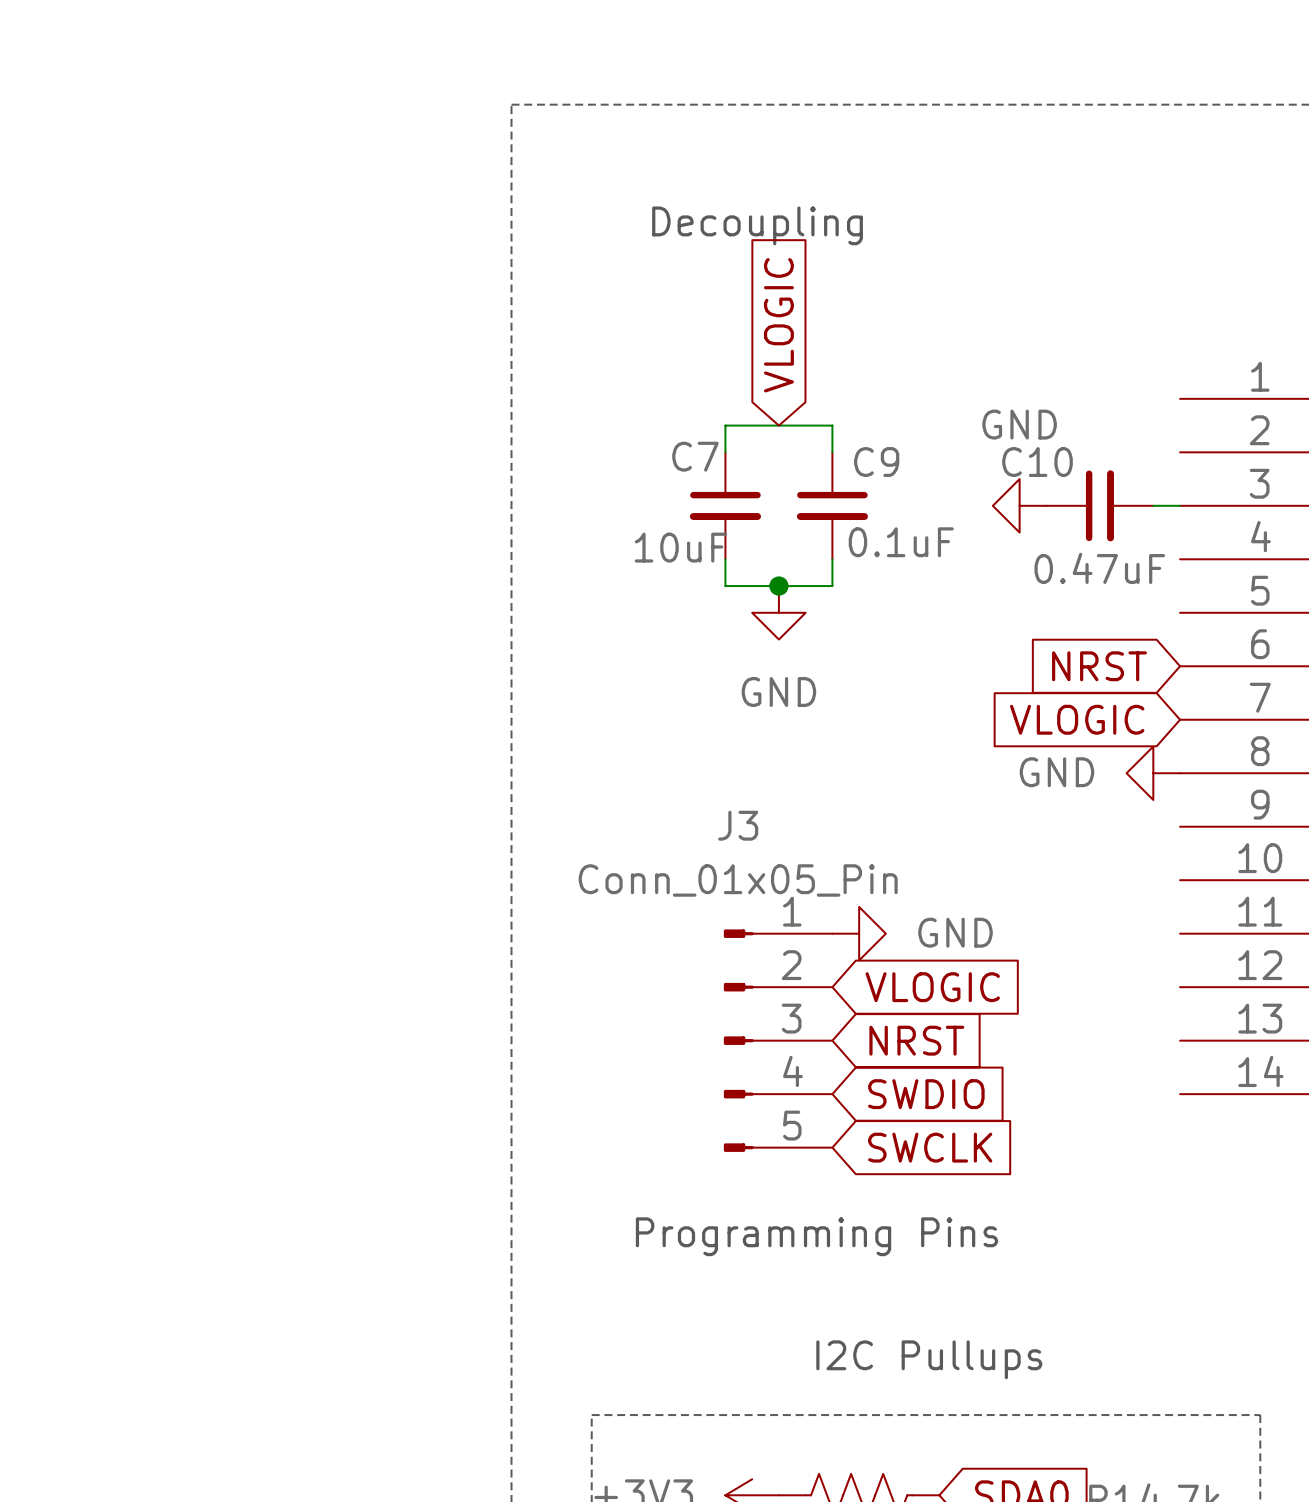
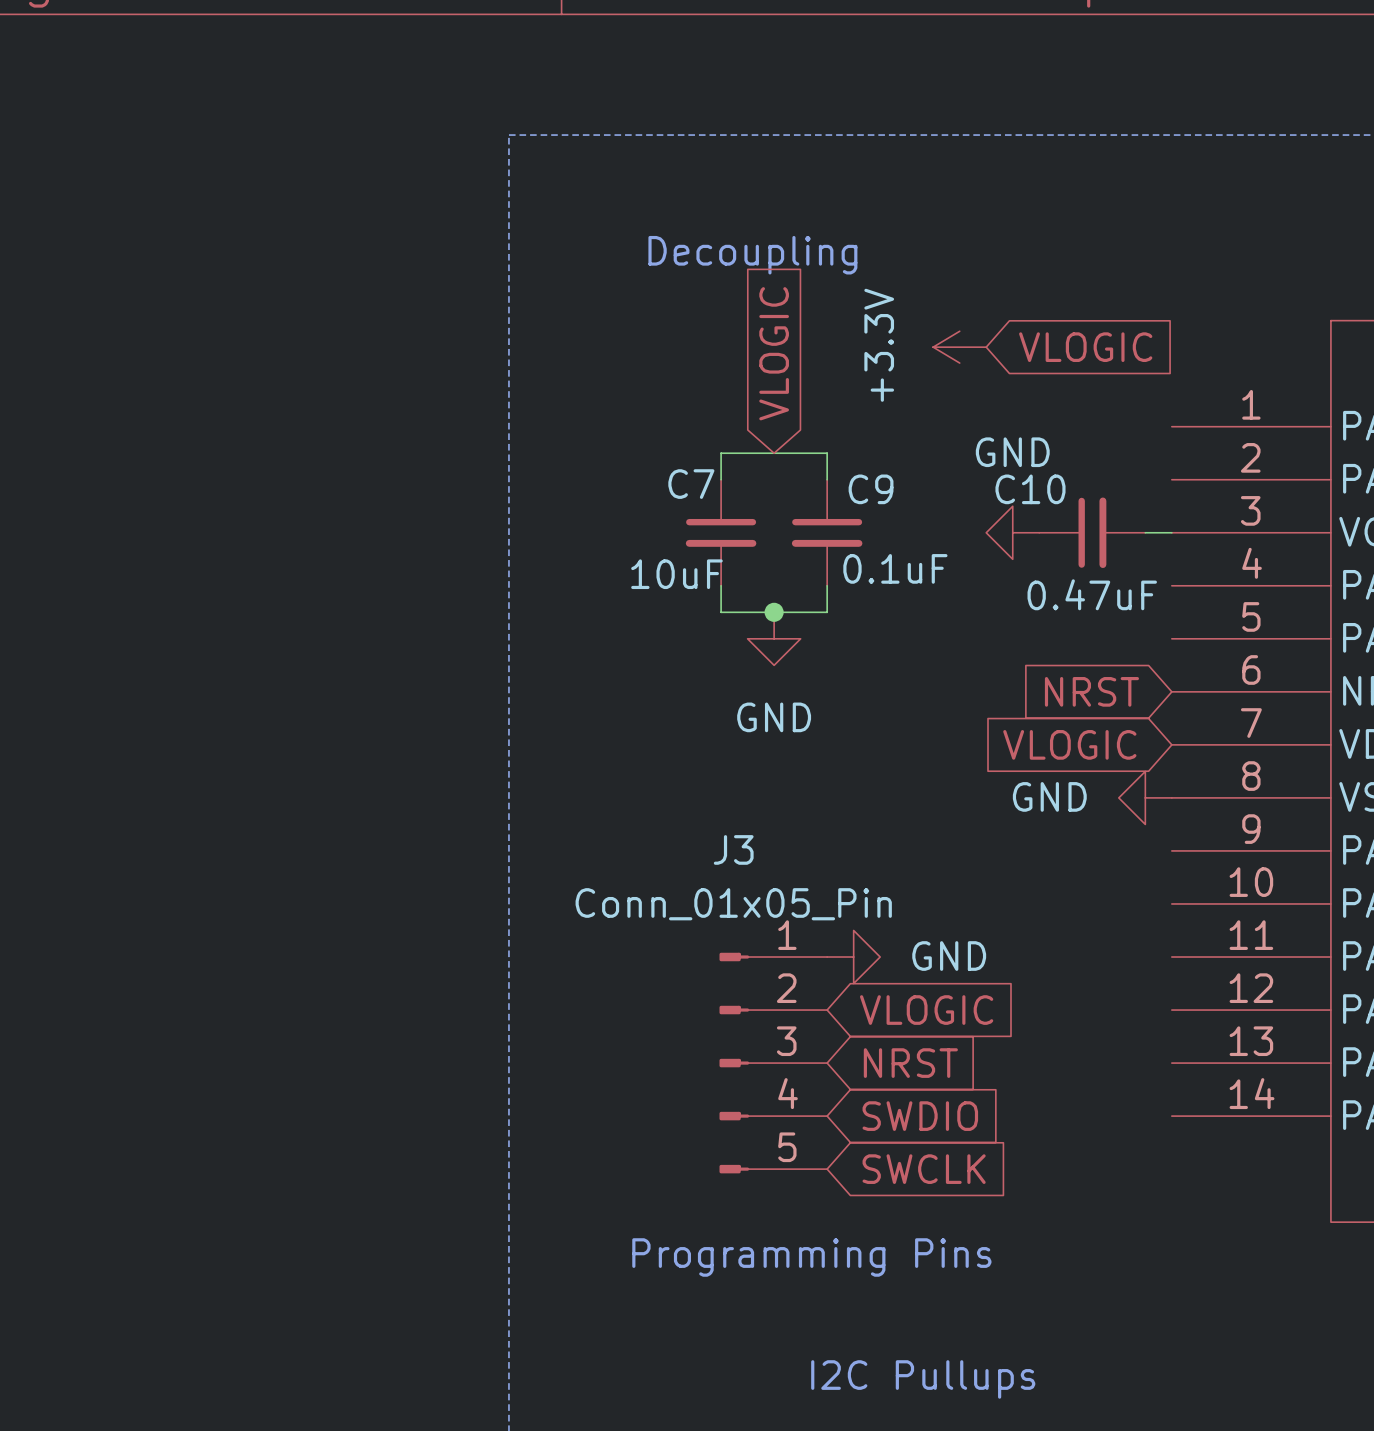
power symbol: none -> +3.3V (959, 347)
global label: none -> VLOGIC (1085, 347)

